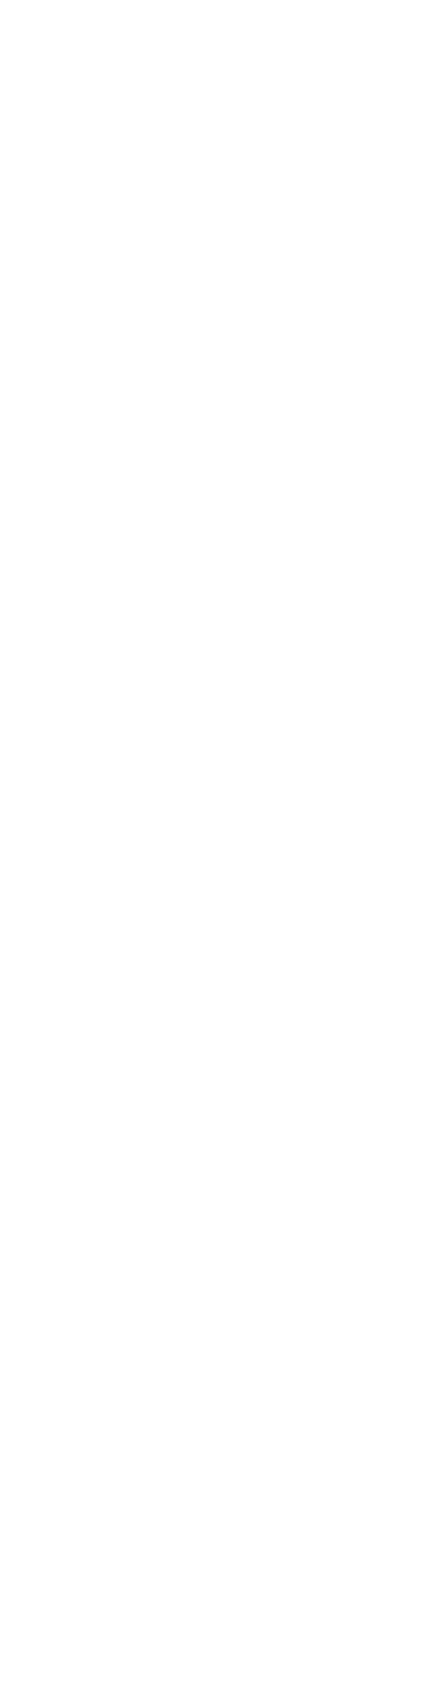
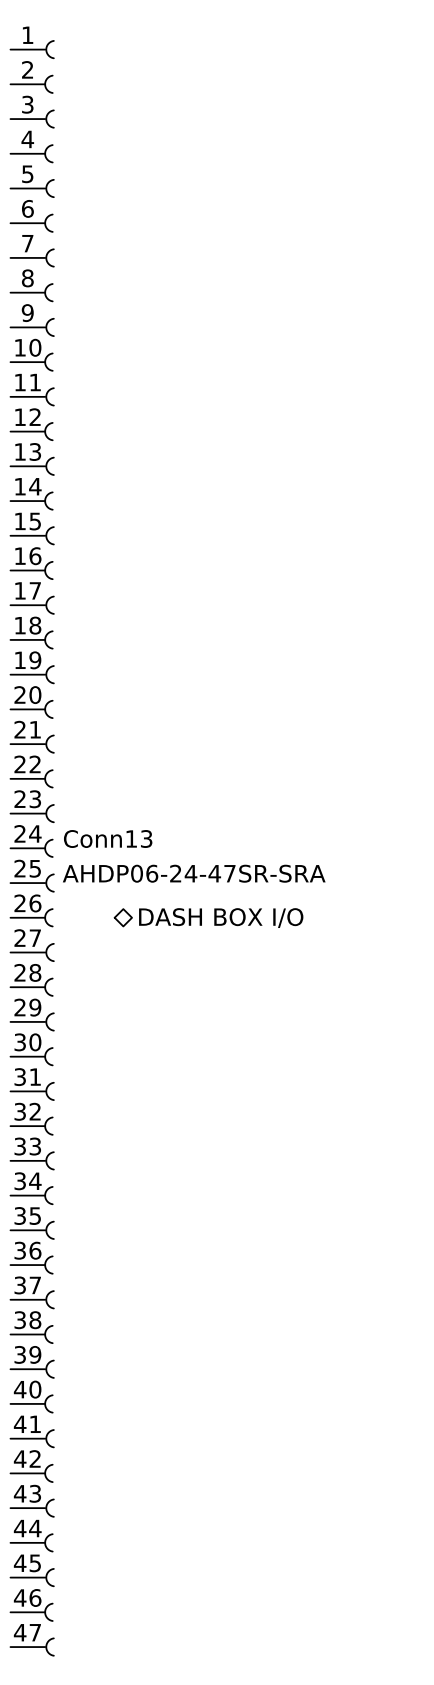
Conn13: none -> (32, 848)
hierarchical label: none -> DASH BOX I/O (221, 918)

